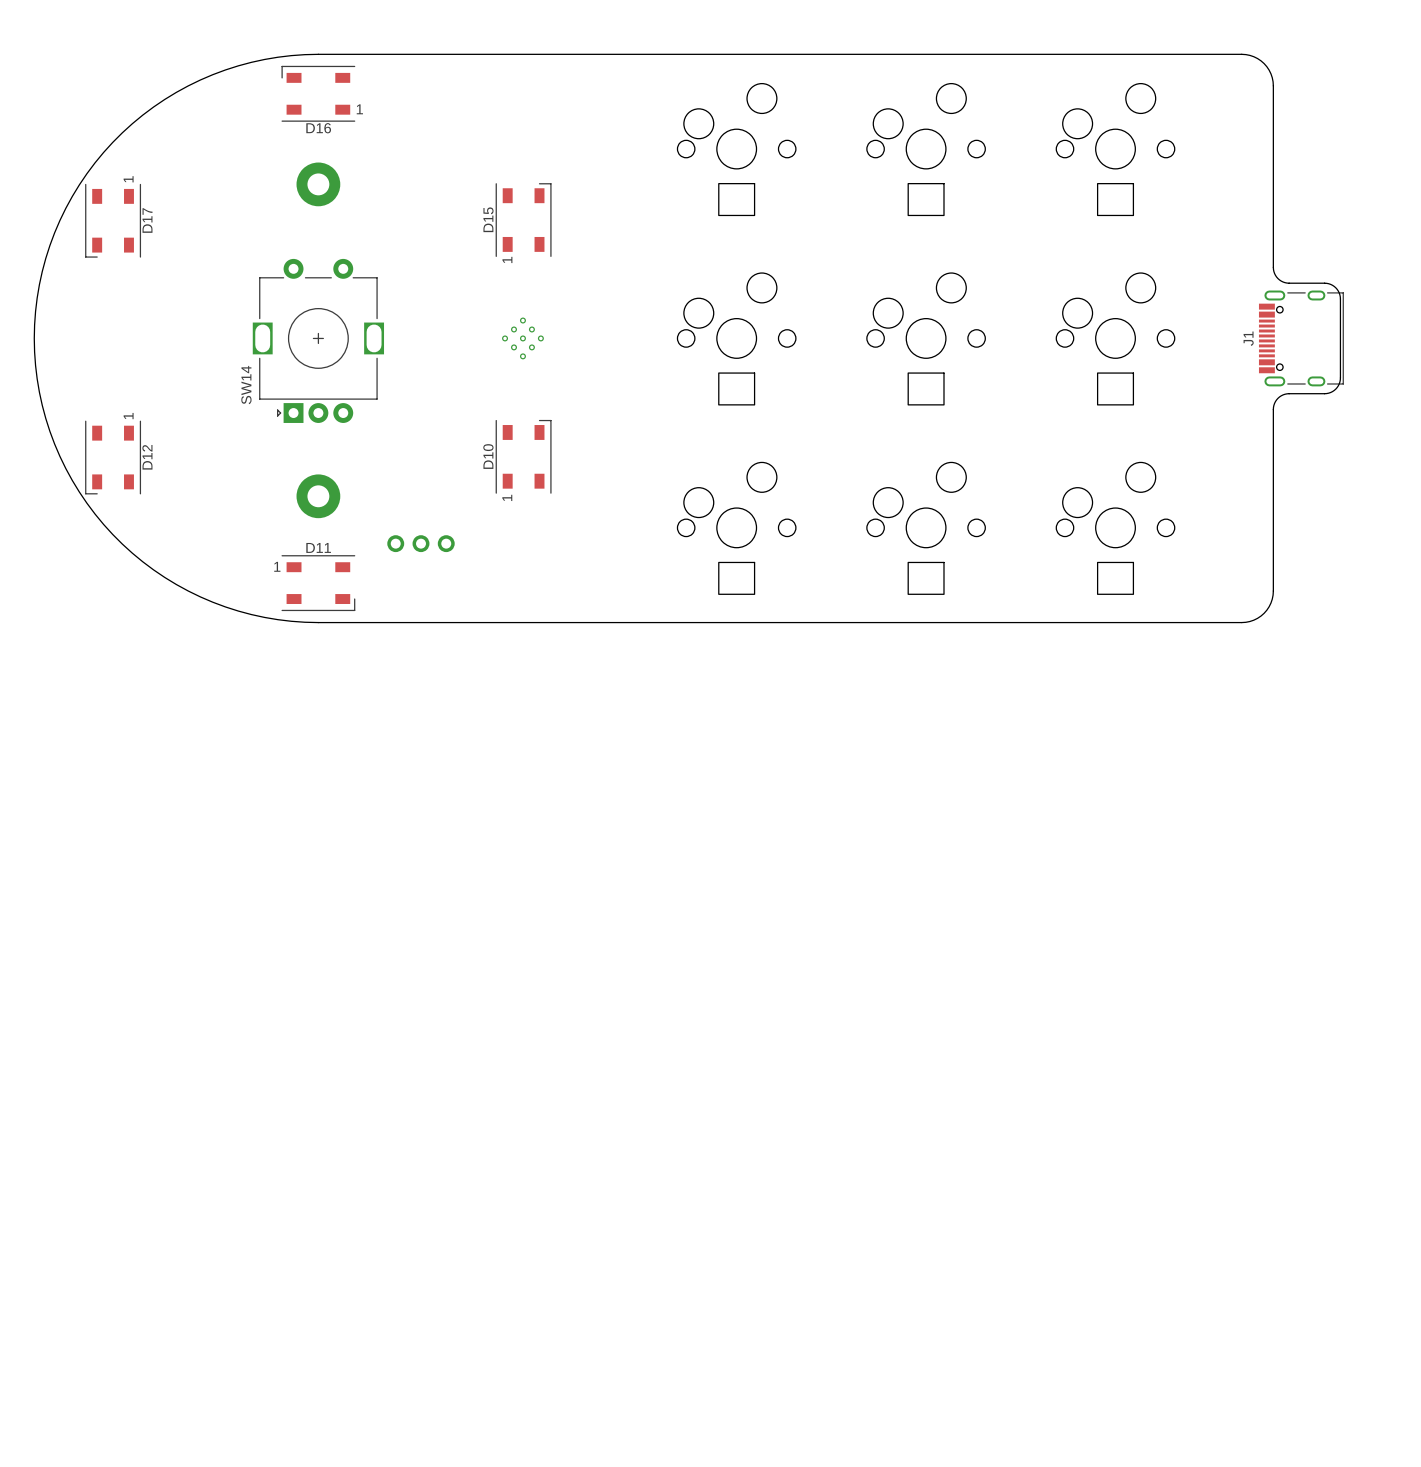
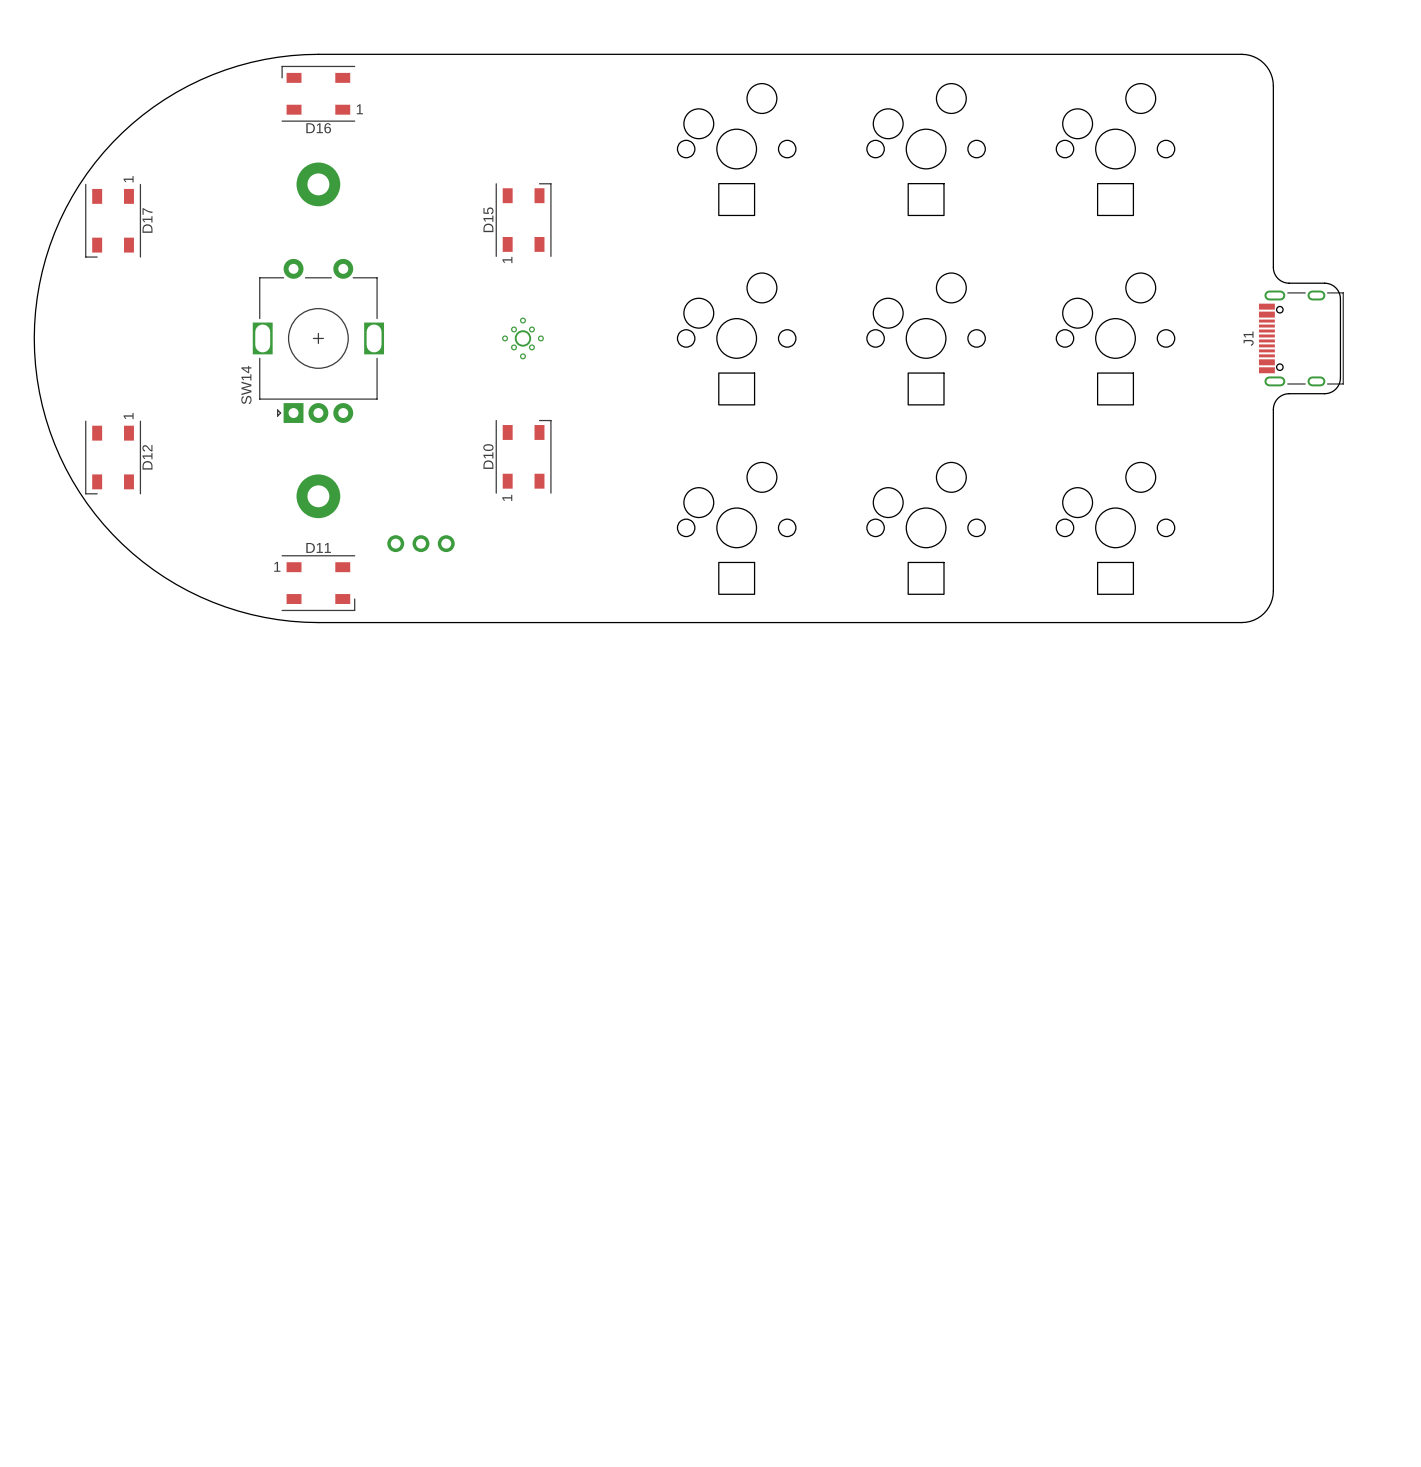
part footprint: [502, 317, 544, 360] -> [502, 317, 544, 360]

